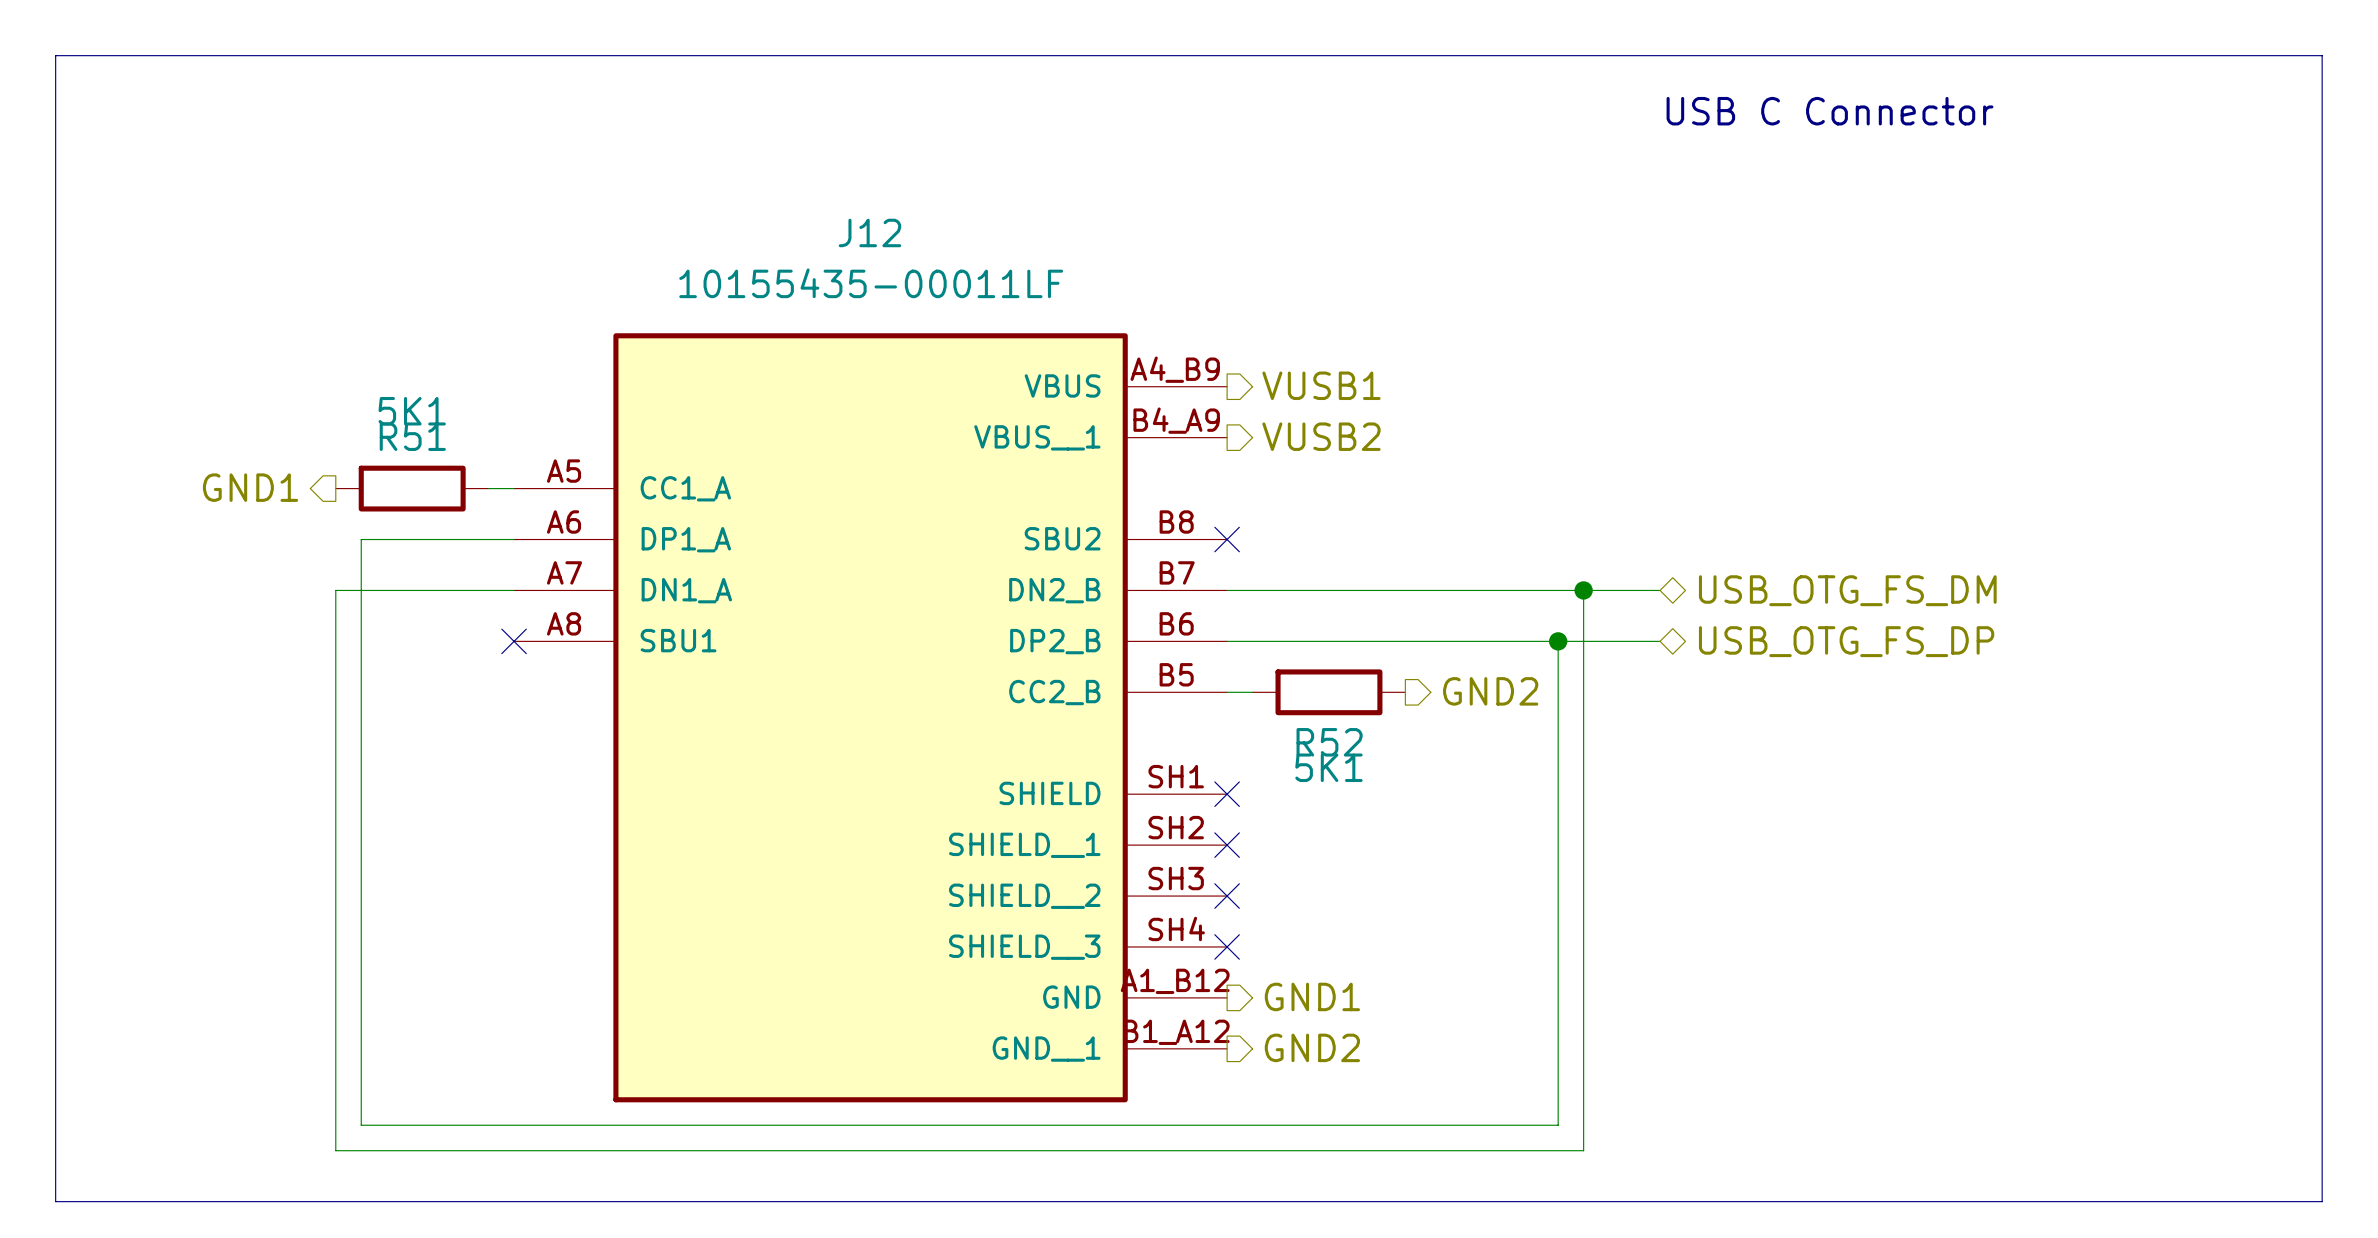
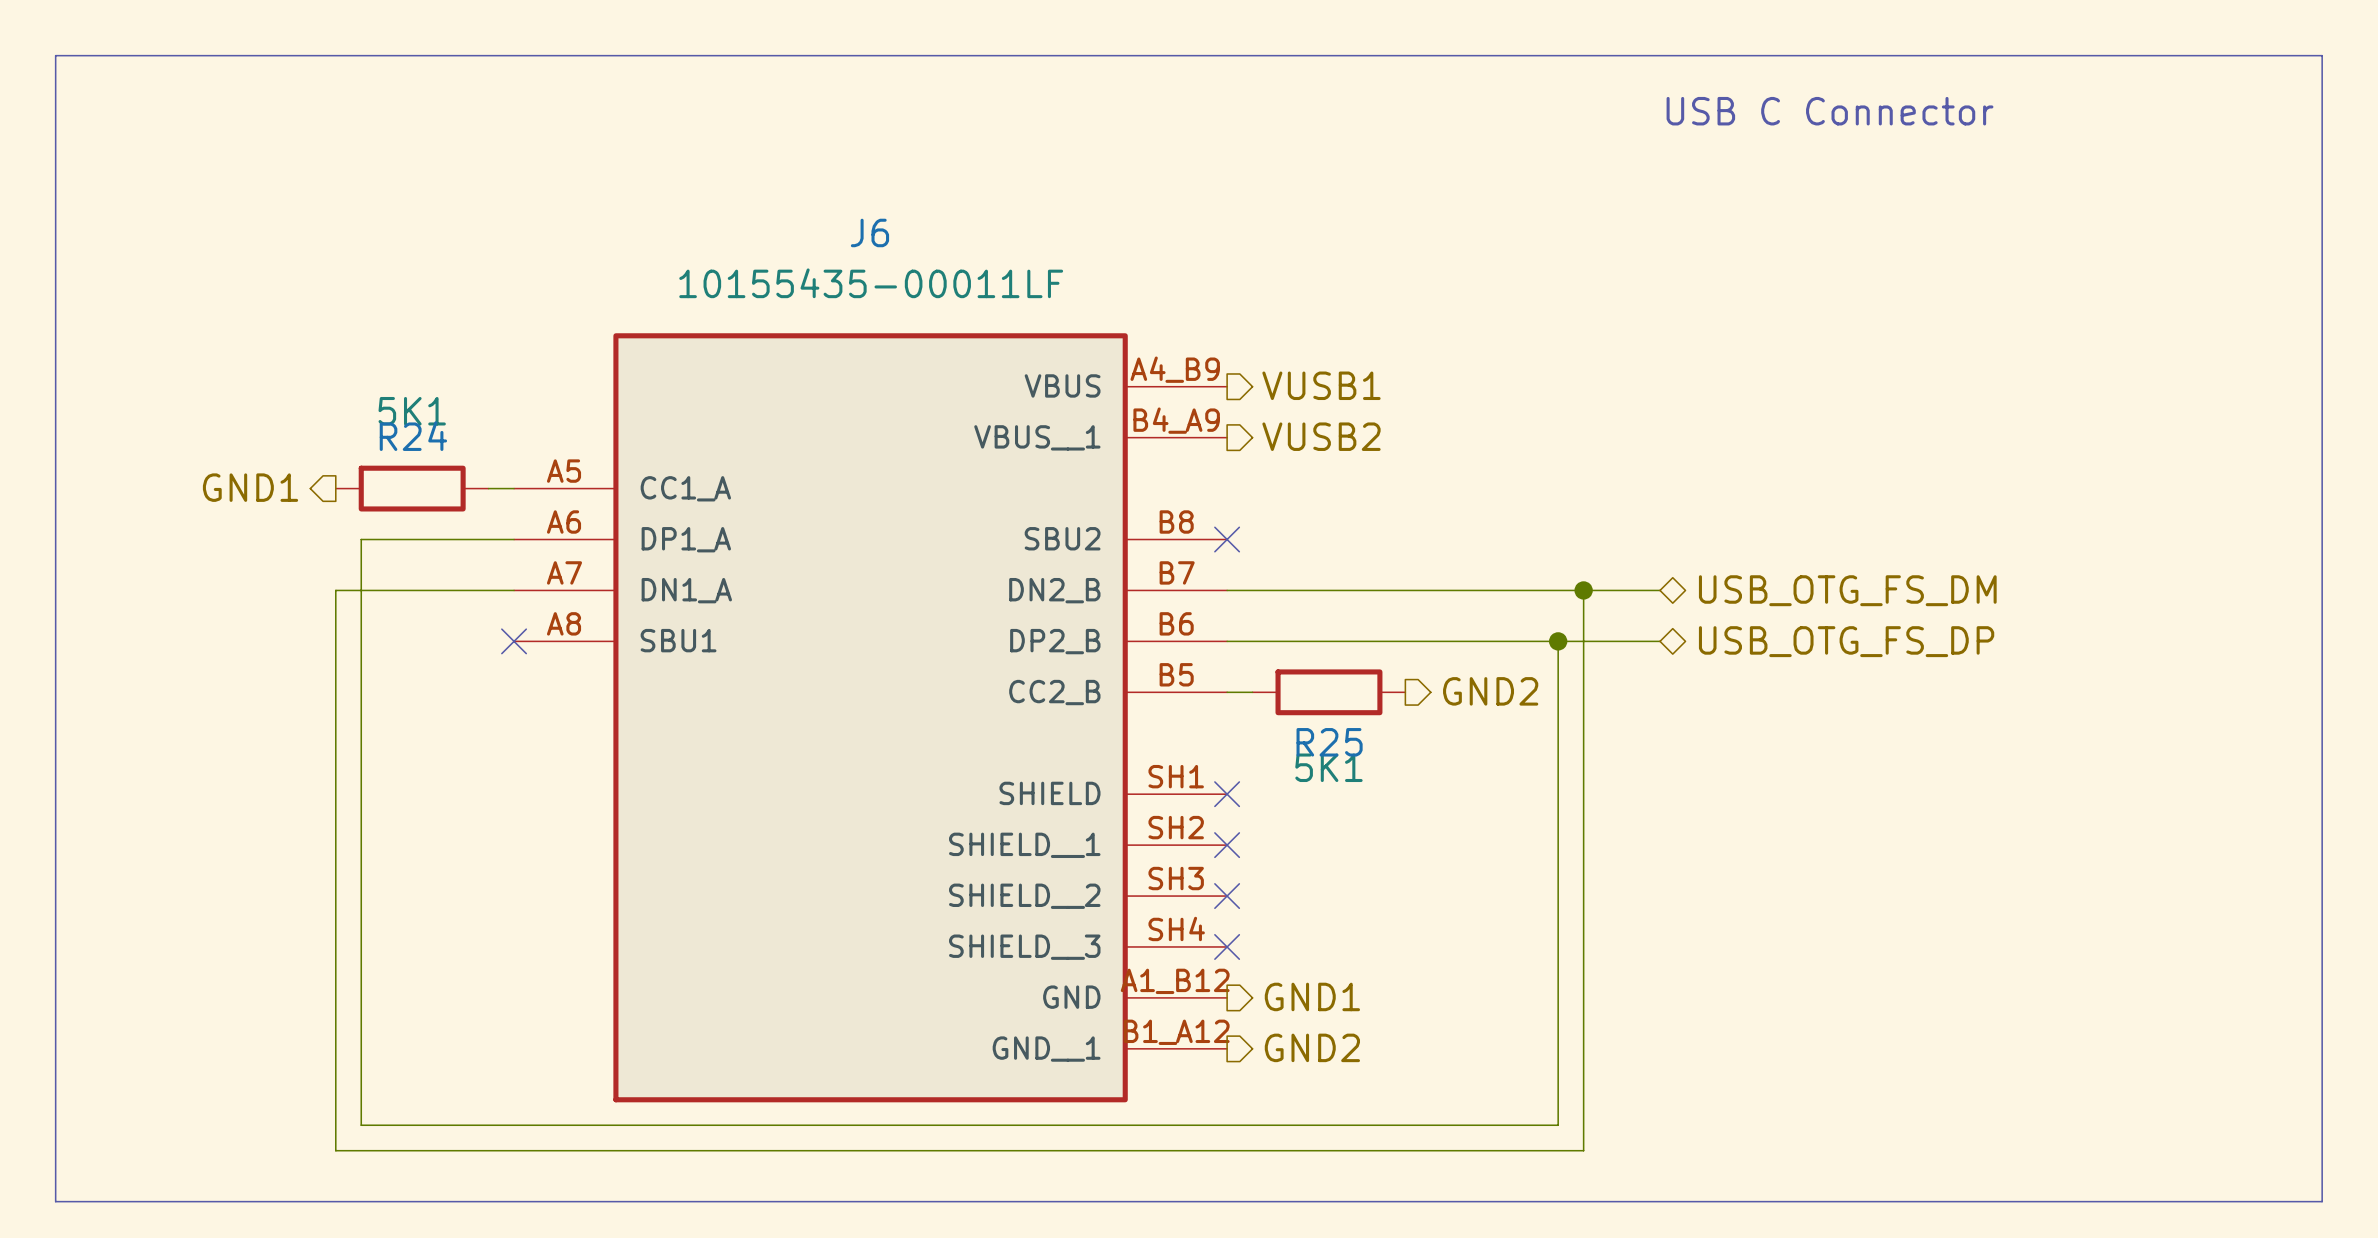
J12 name: J12 (869, 232) -> J6 (869, 232)
R51 name: R51 (412, 436) -> R24 (413, 436)
R52 name: R52 (1329, 742) -> R25 (1329, 742)

